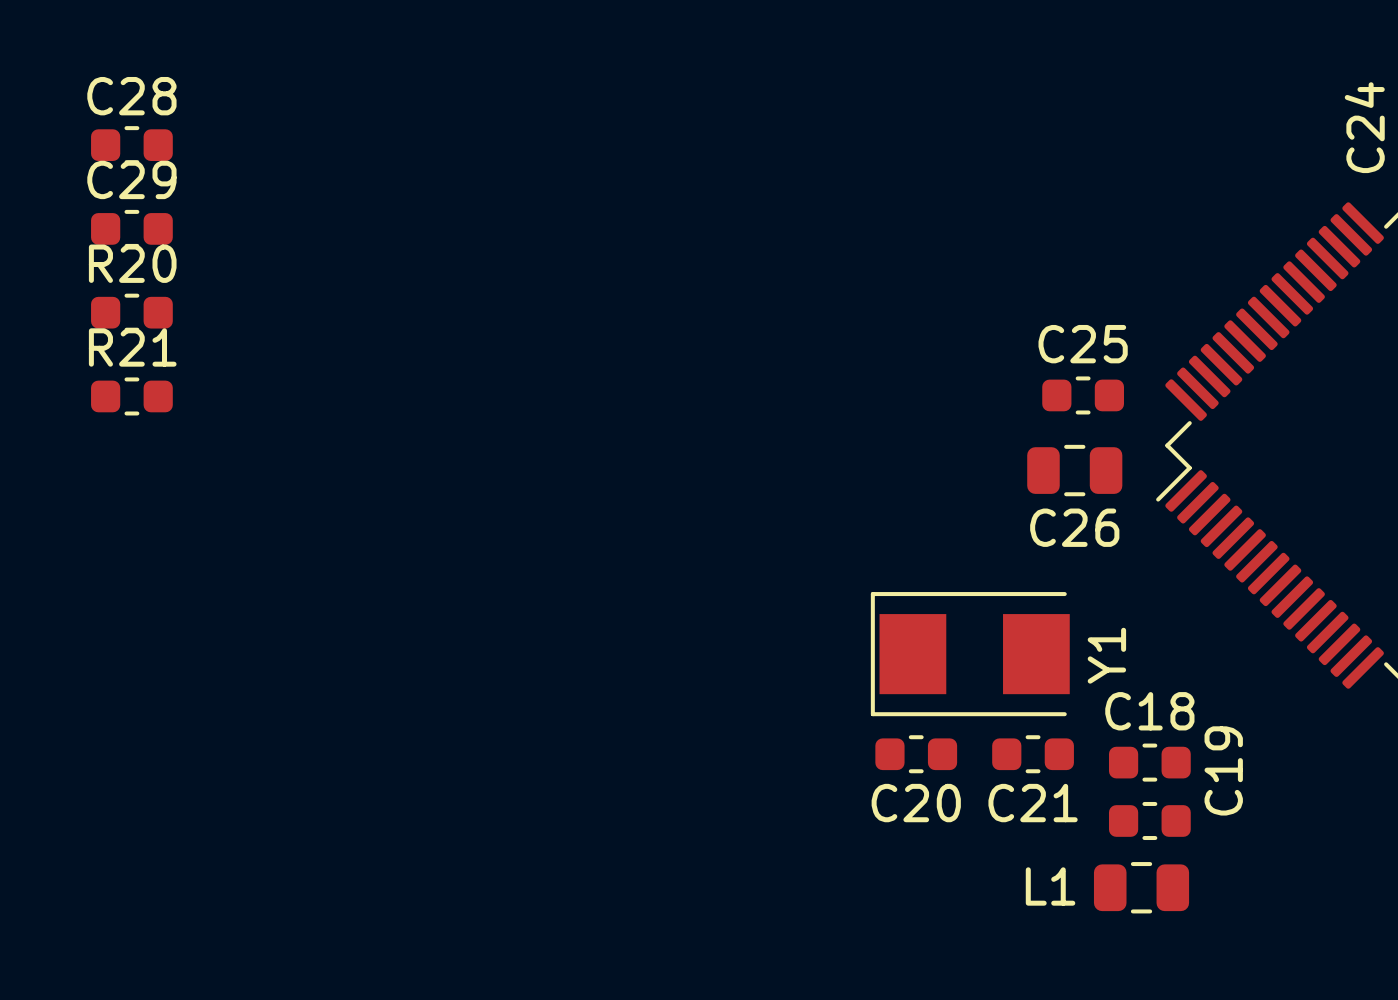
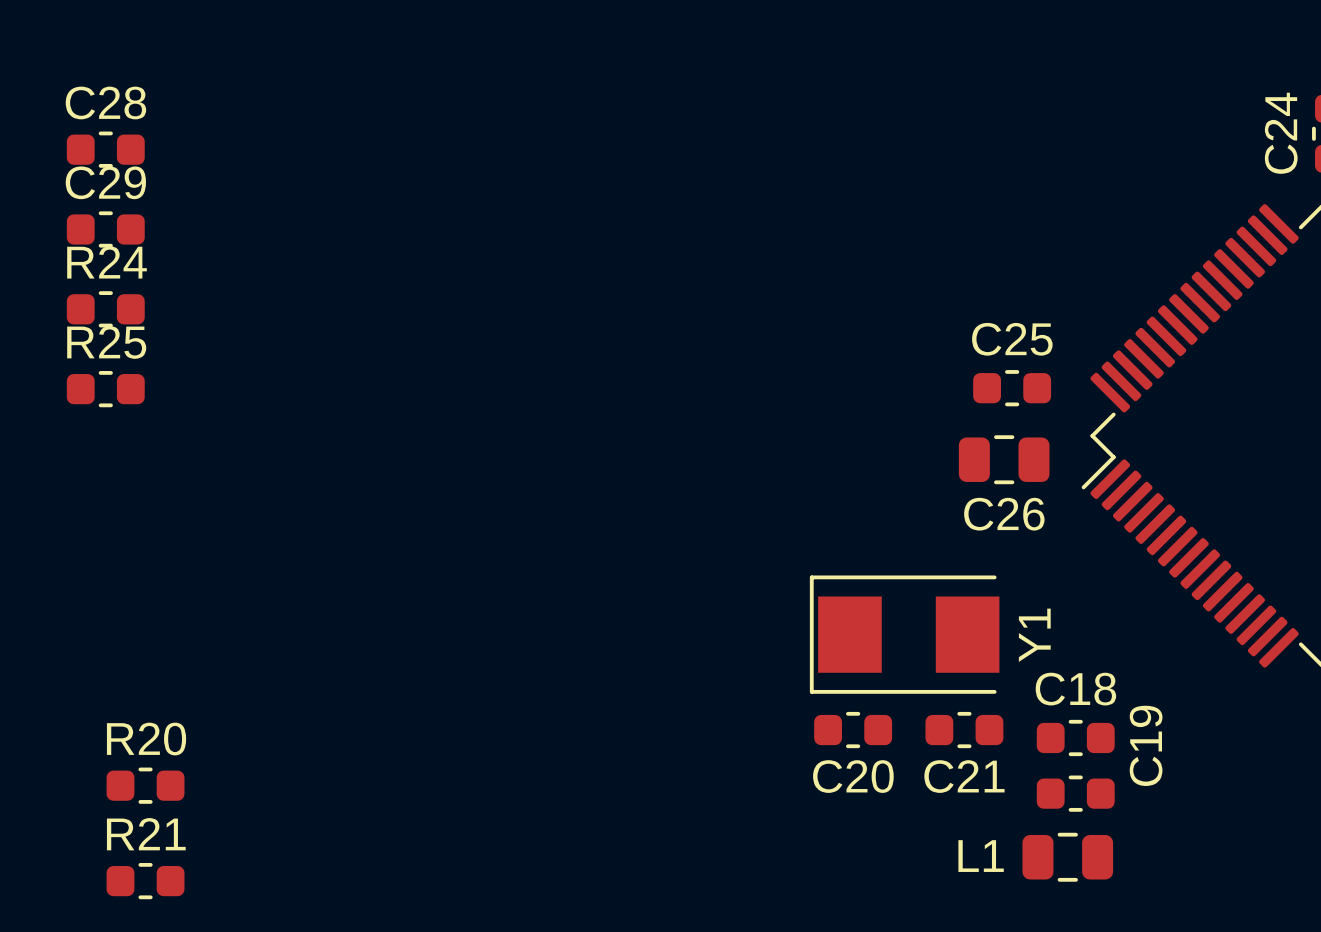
R20 name: R20 (132, 263) -> R24 (107, 262)
R21 name: R21 (132, 347) -> R25 (106, 342)
R20: none -> (145, 785)
R21: none -> (145, 881)

